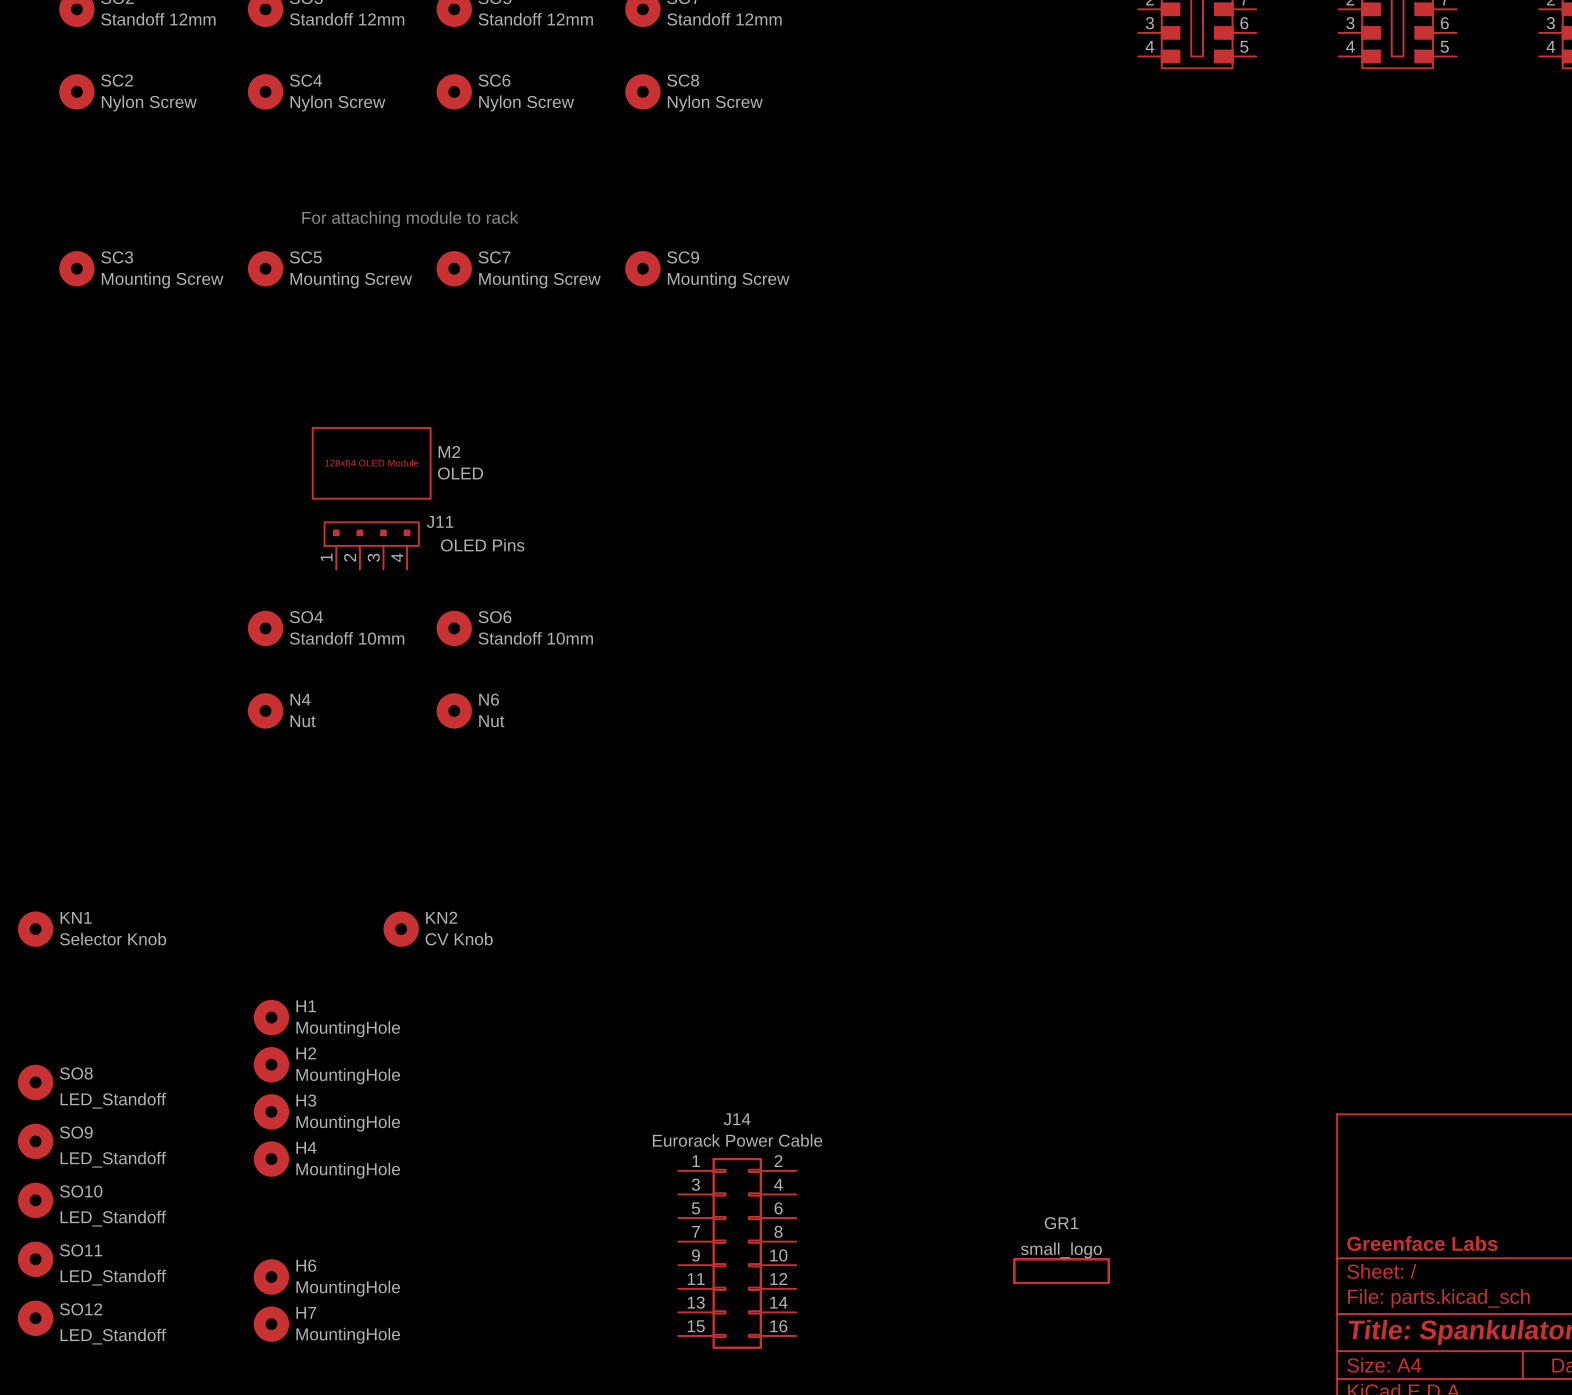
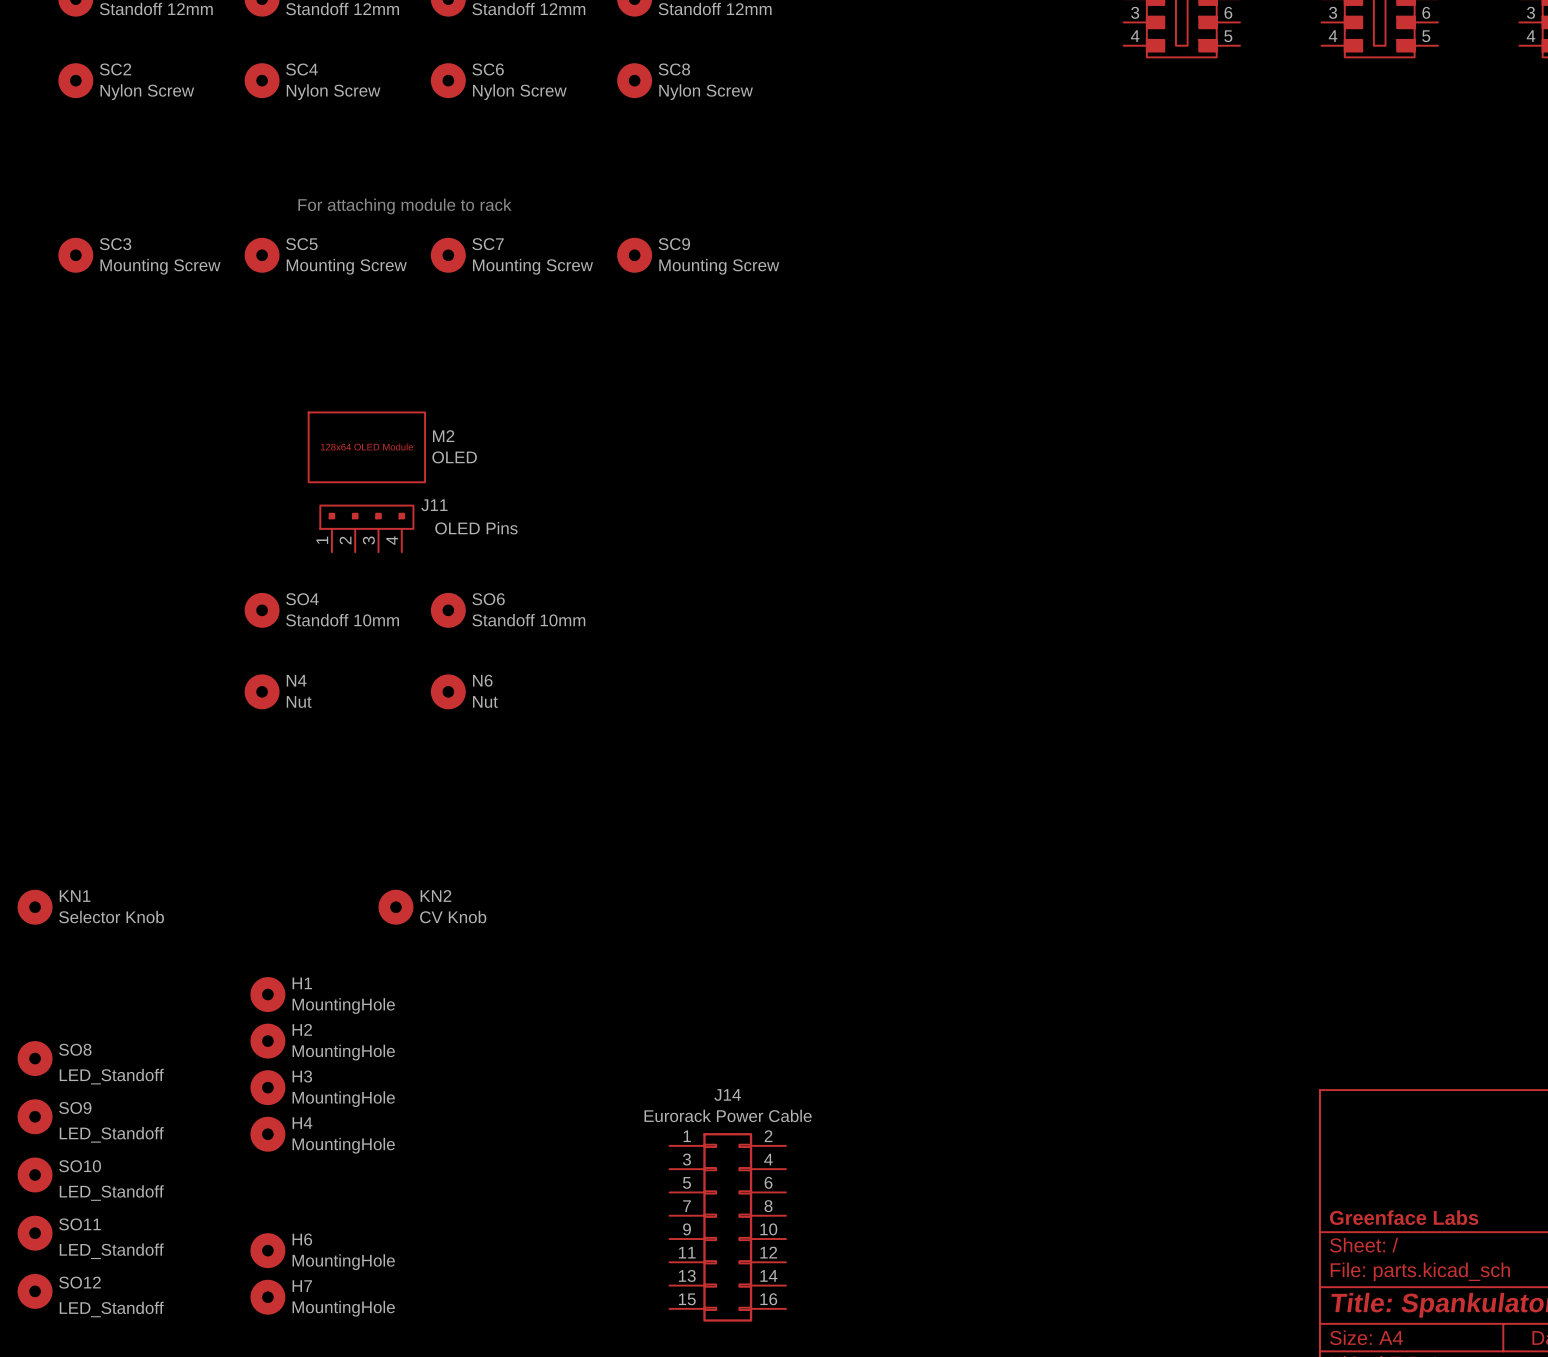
GR1: small_logo (1061, 1271) -> none

